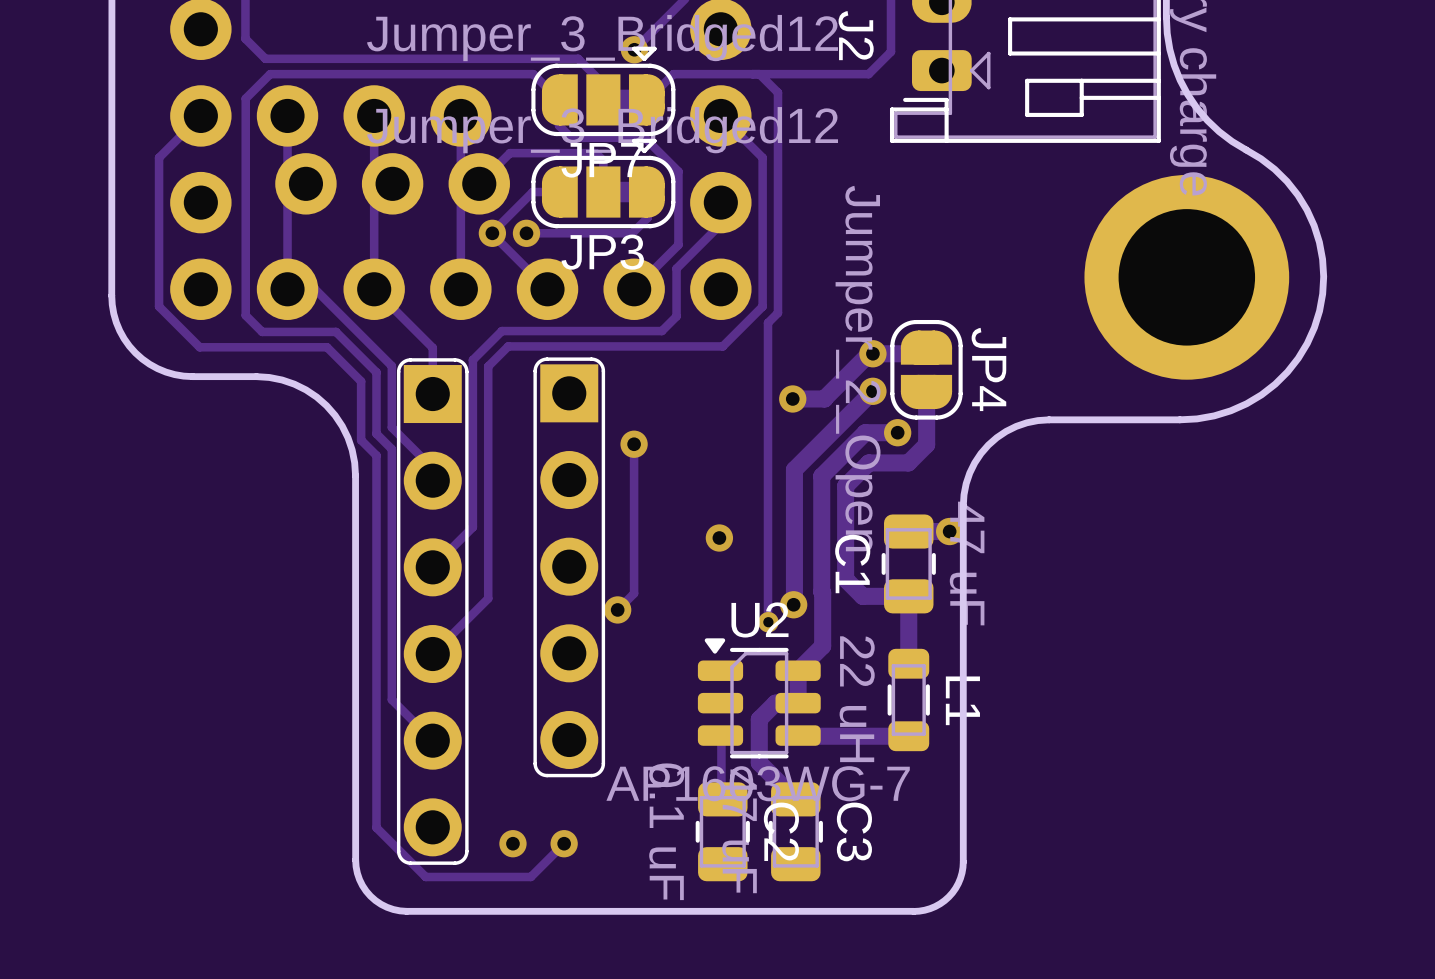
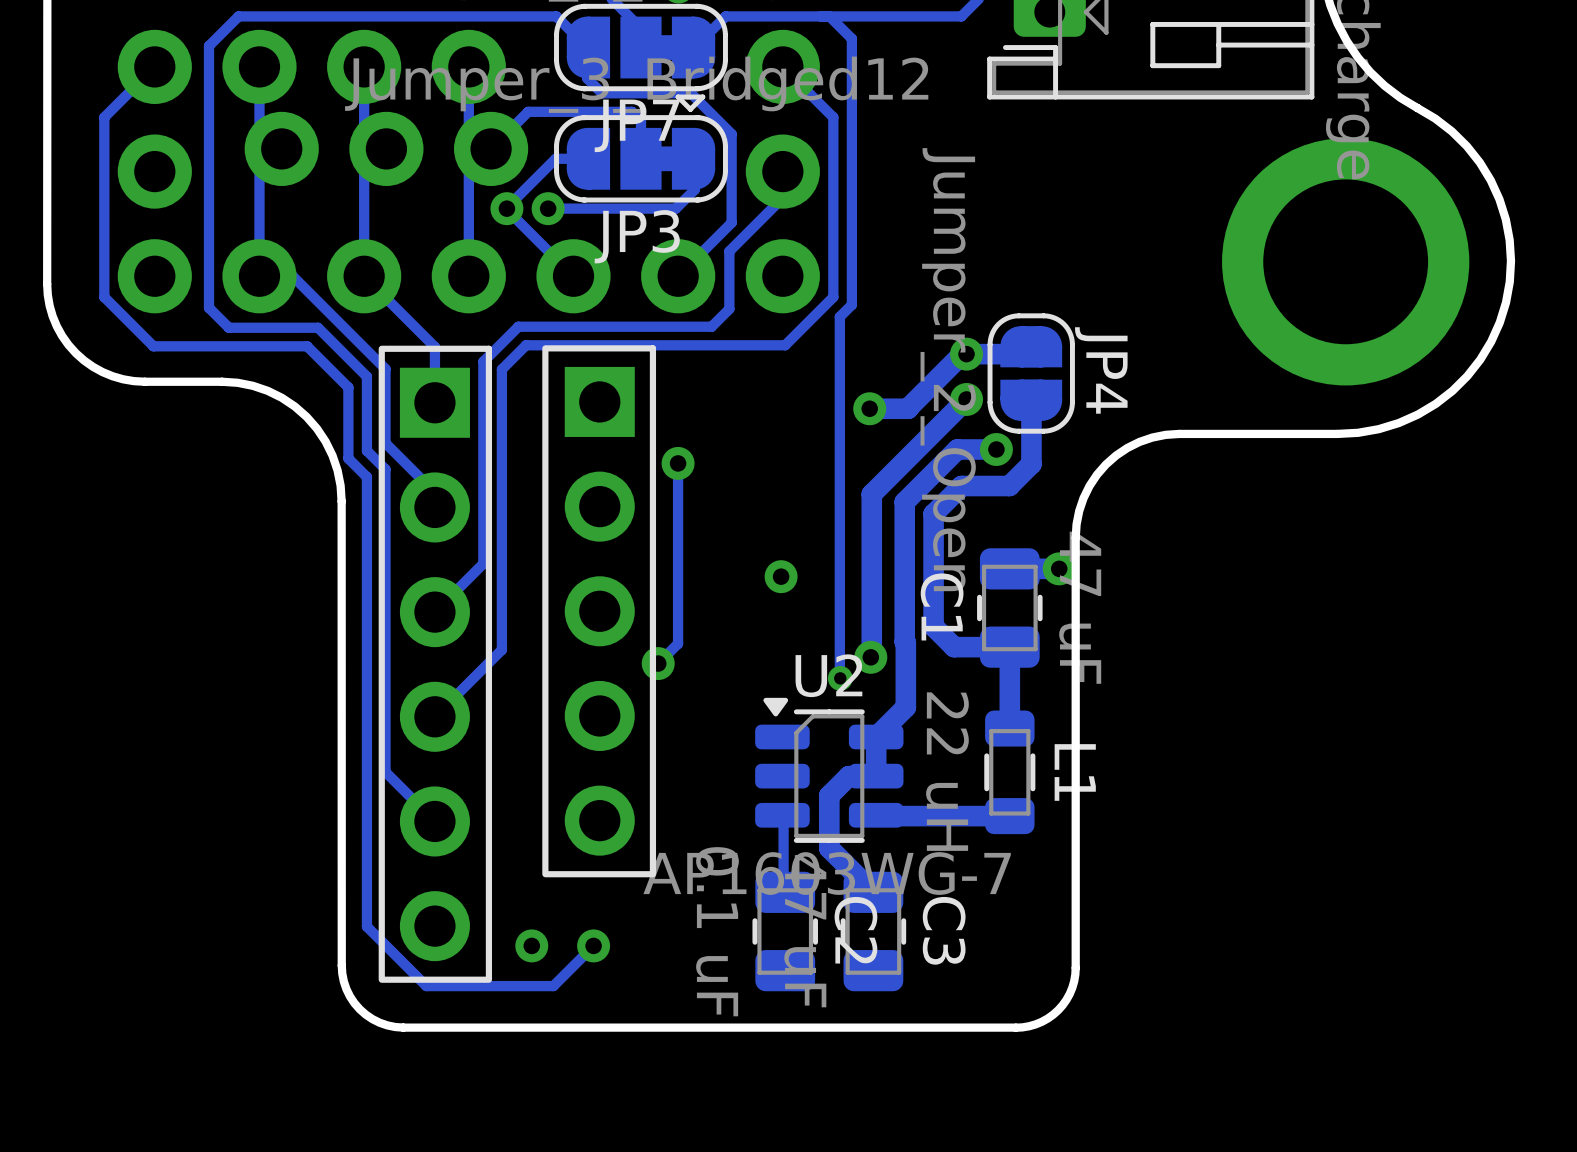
part footprint: [533, 357, 606, 778] -> [542, 345, 657, 878]
part footprint: [396, 358, 469, 865] -> [378, 345, 493, 983]

